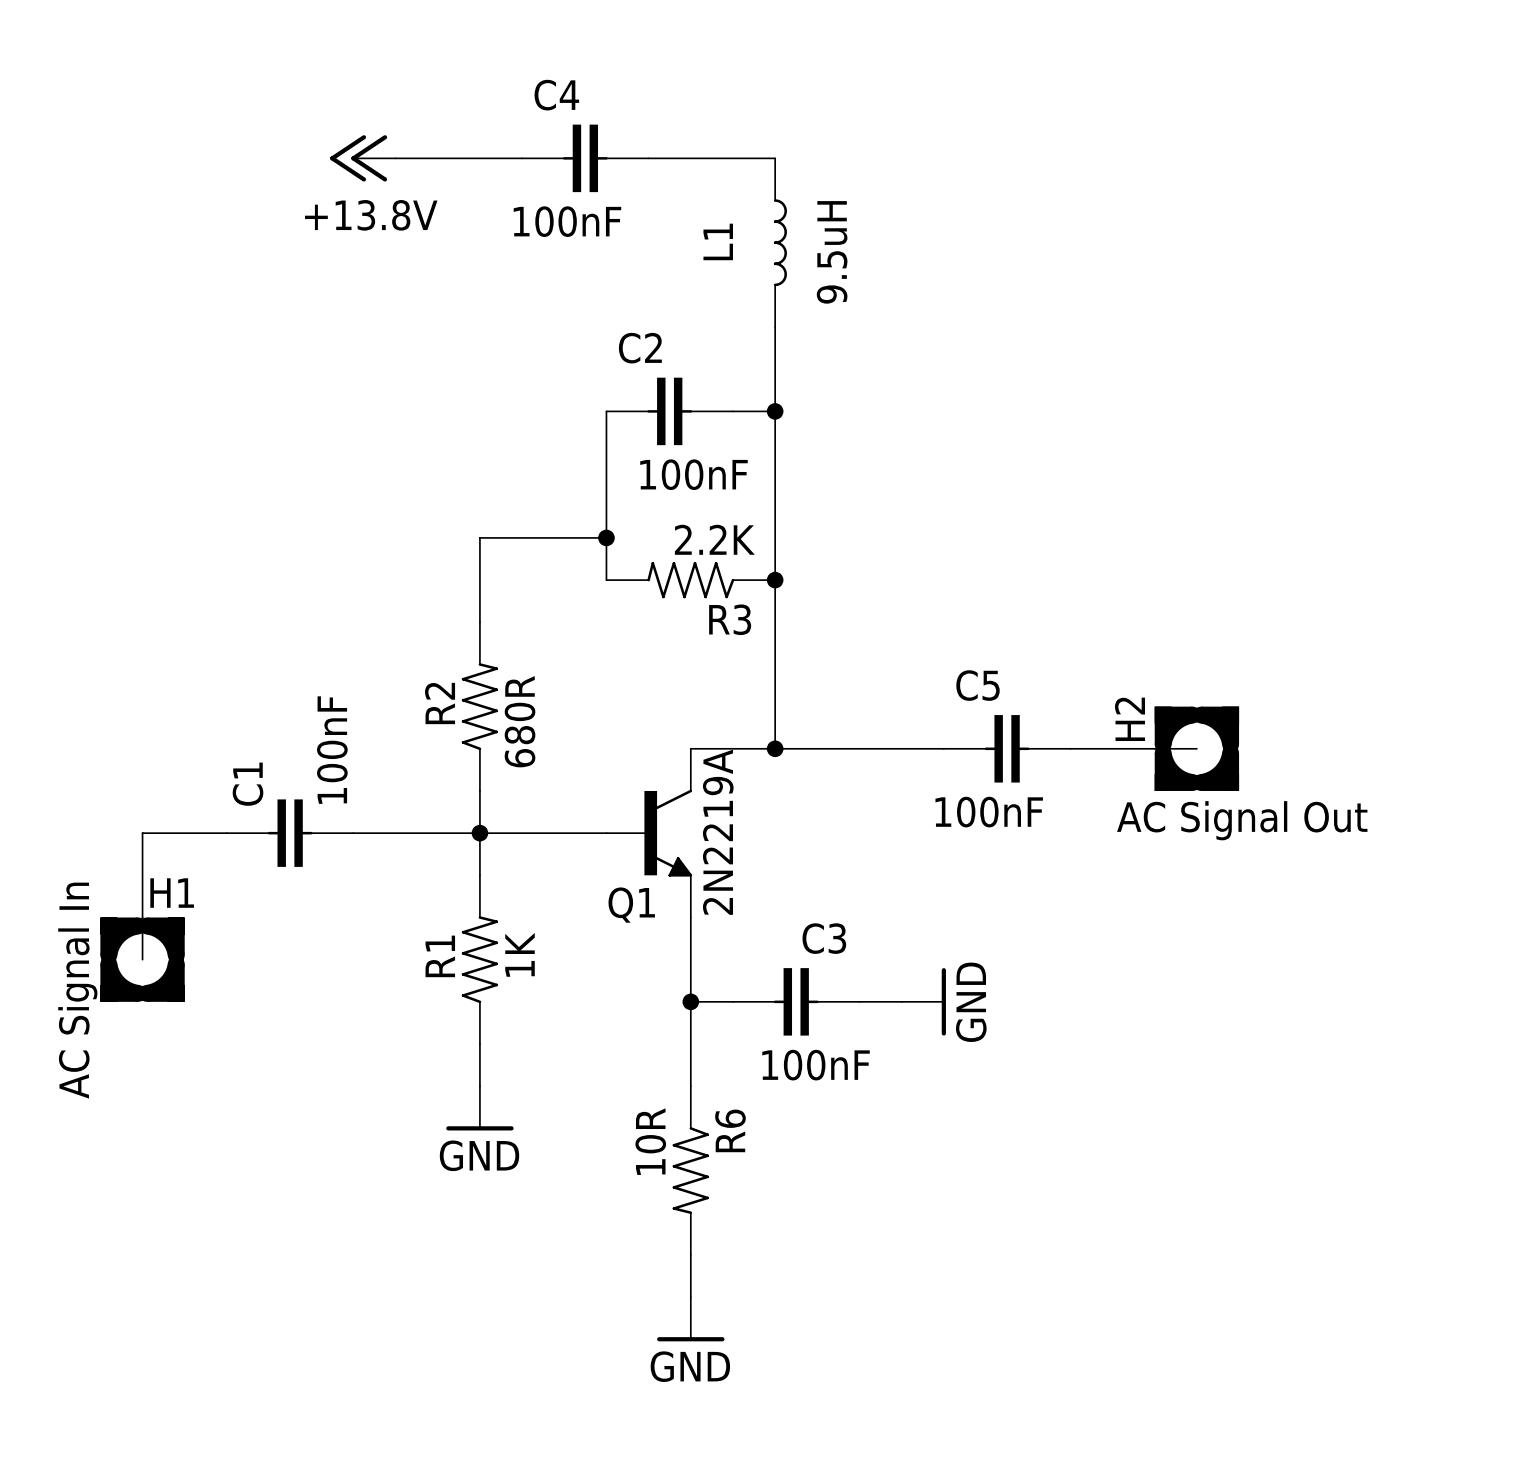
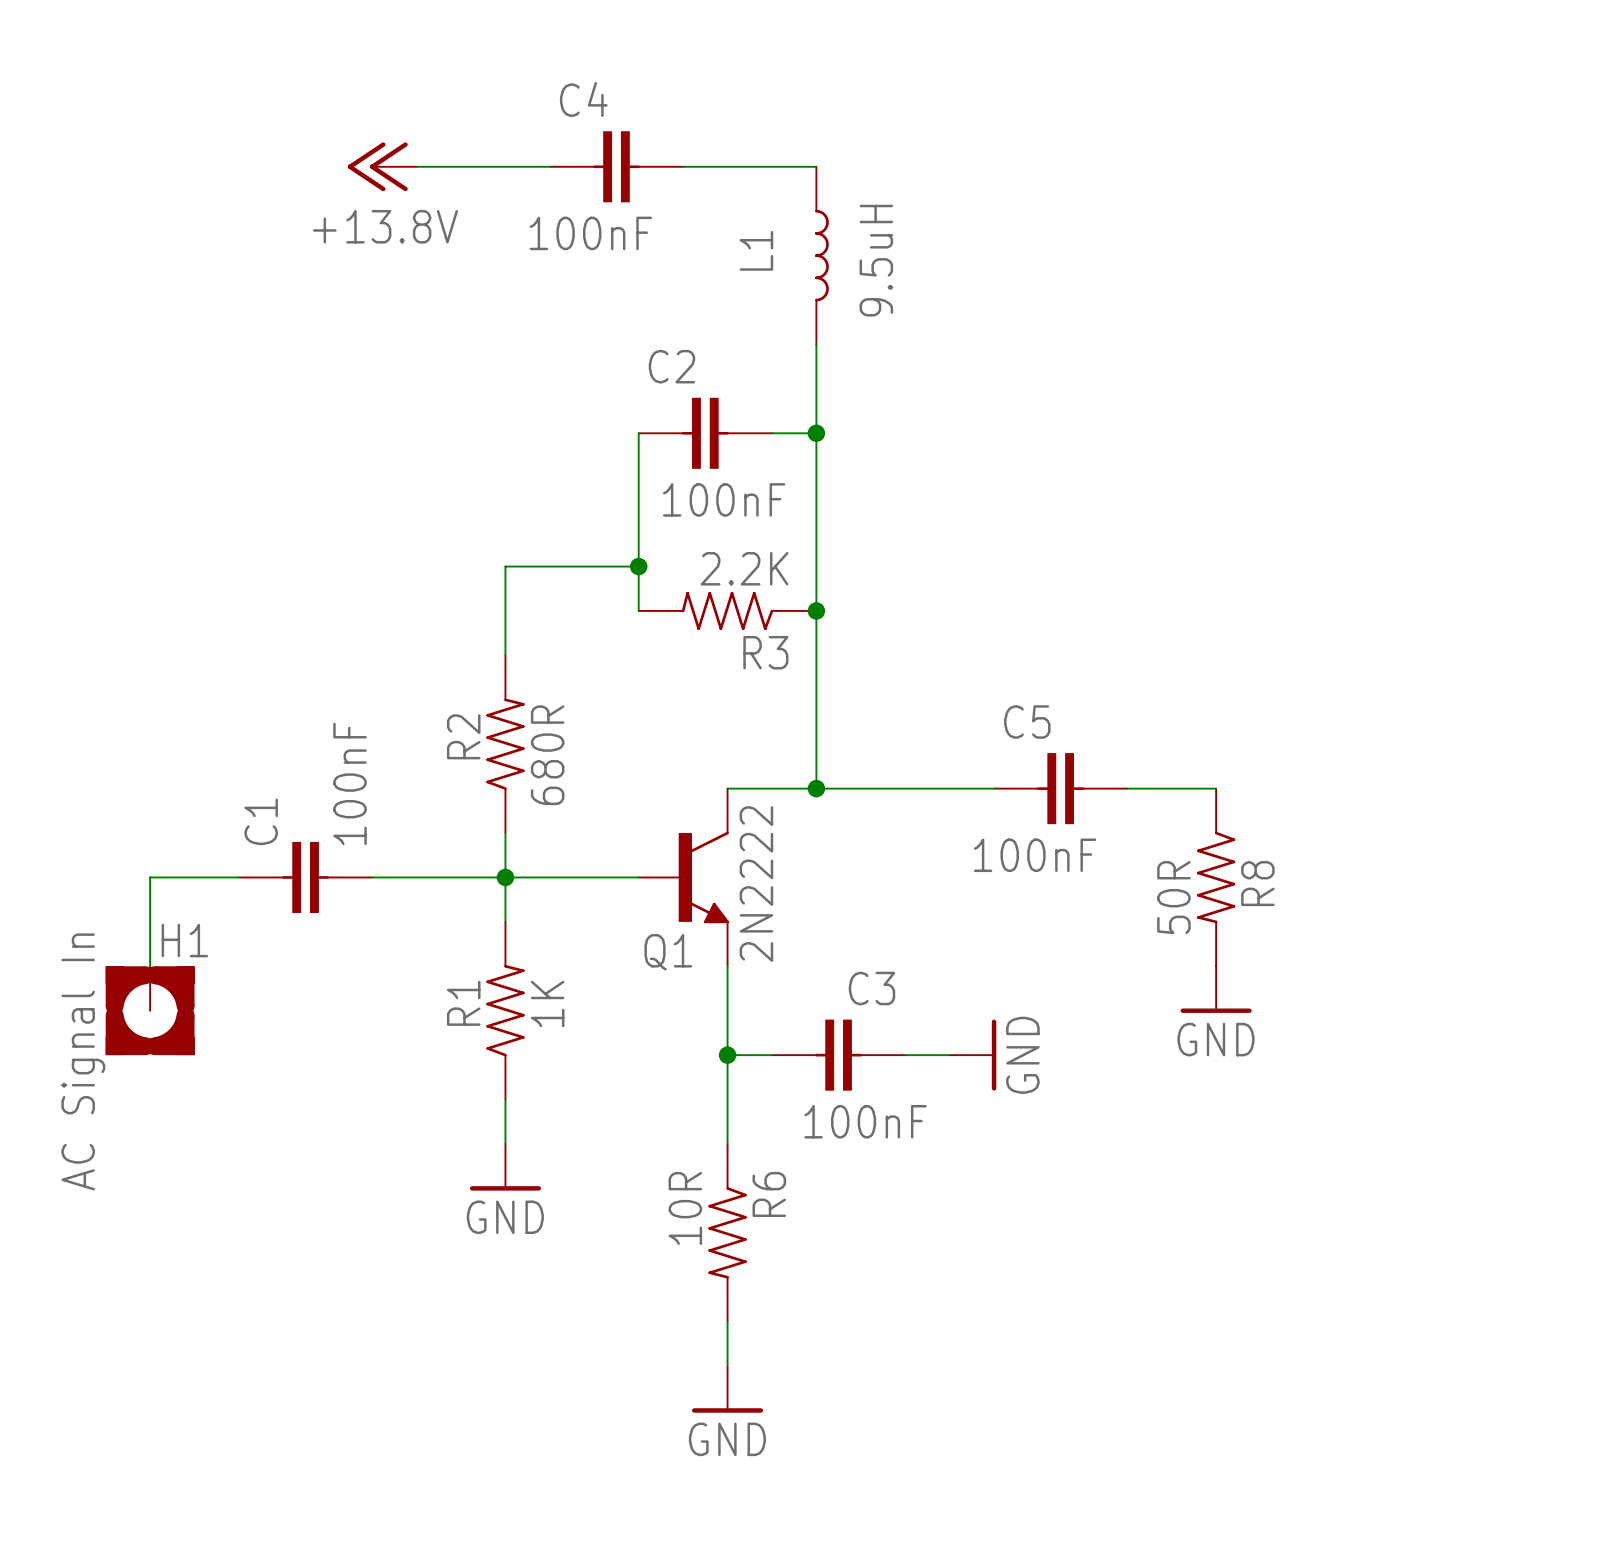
H2: AC Signal Out (1196, 748) -> none
Q1 value: 2N2219A (718, 832) -> 2N2222 (756, 884)
R8: none -> 50R (1216, 877)
power symbol: none -> GND (1216, 989)

